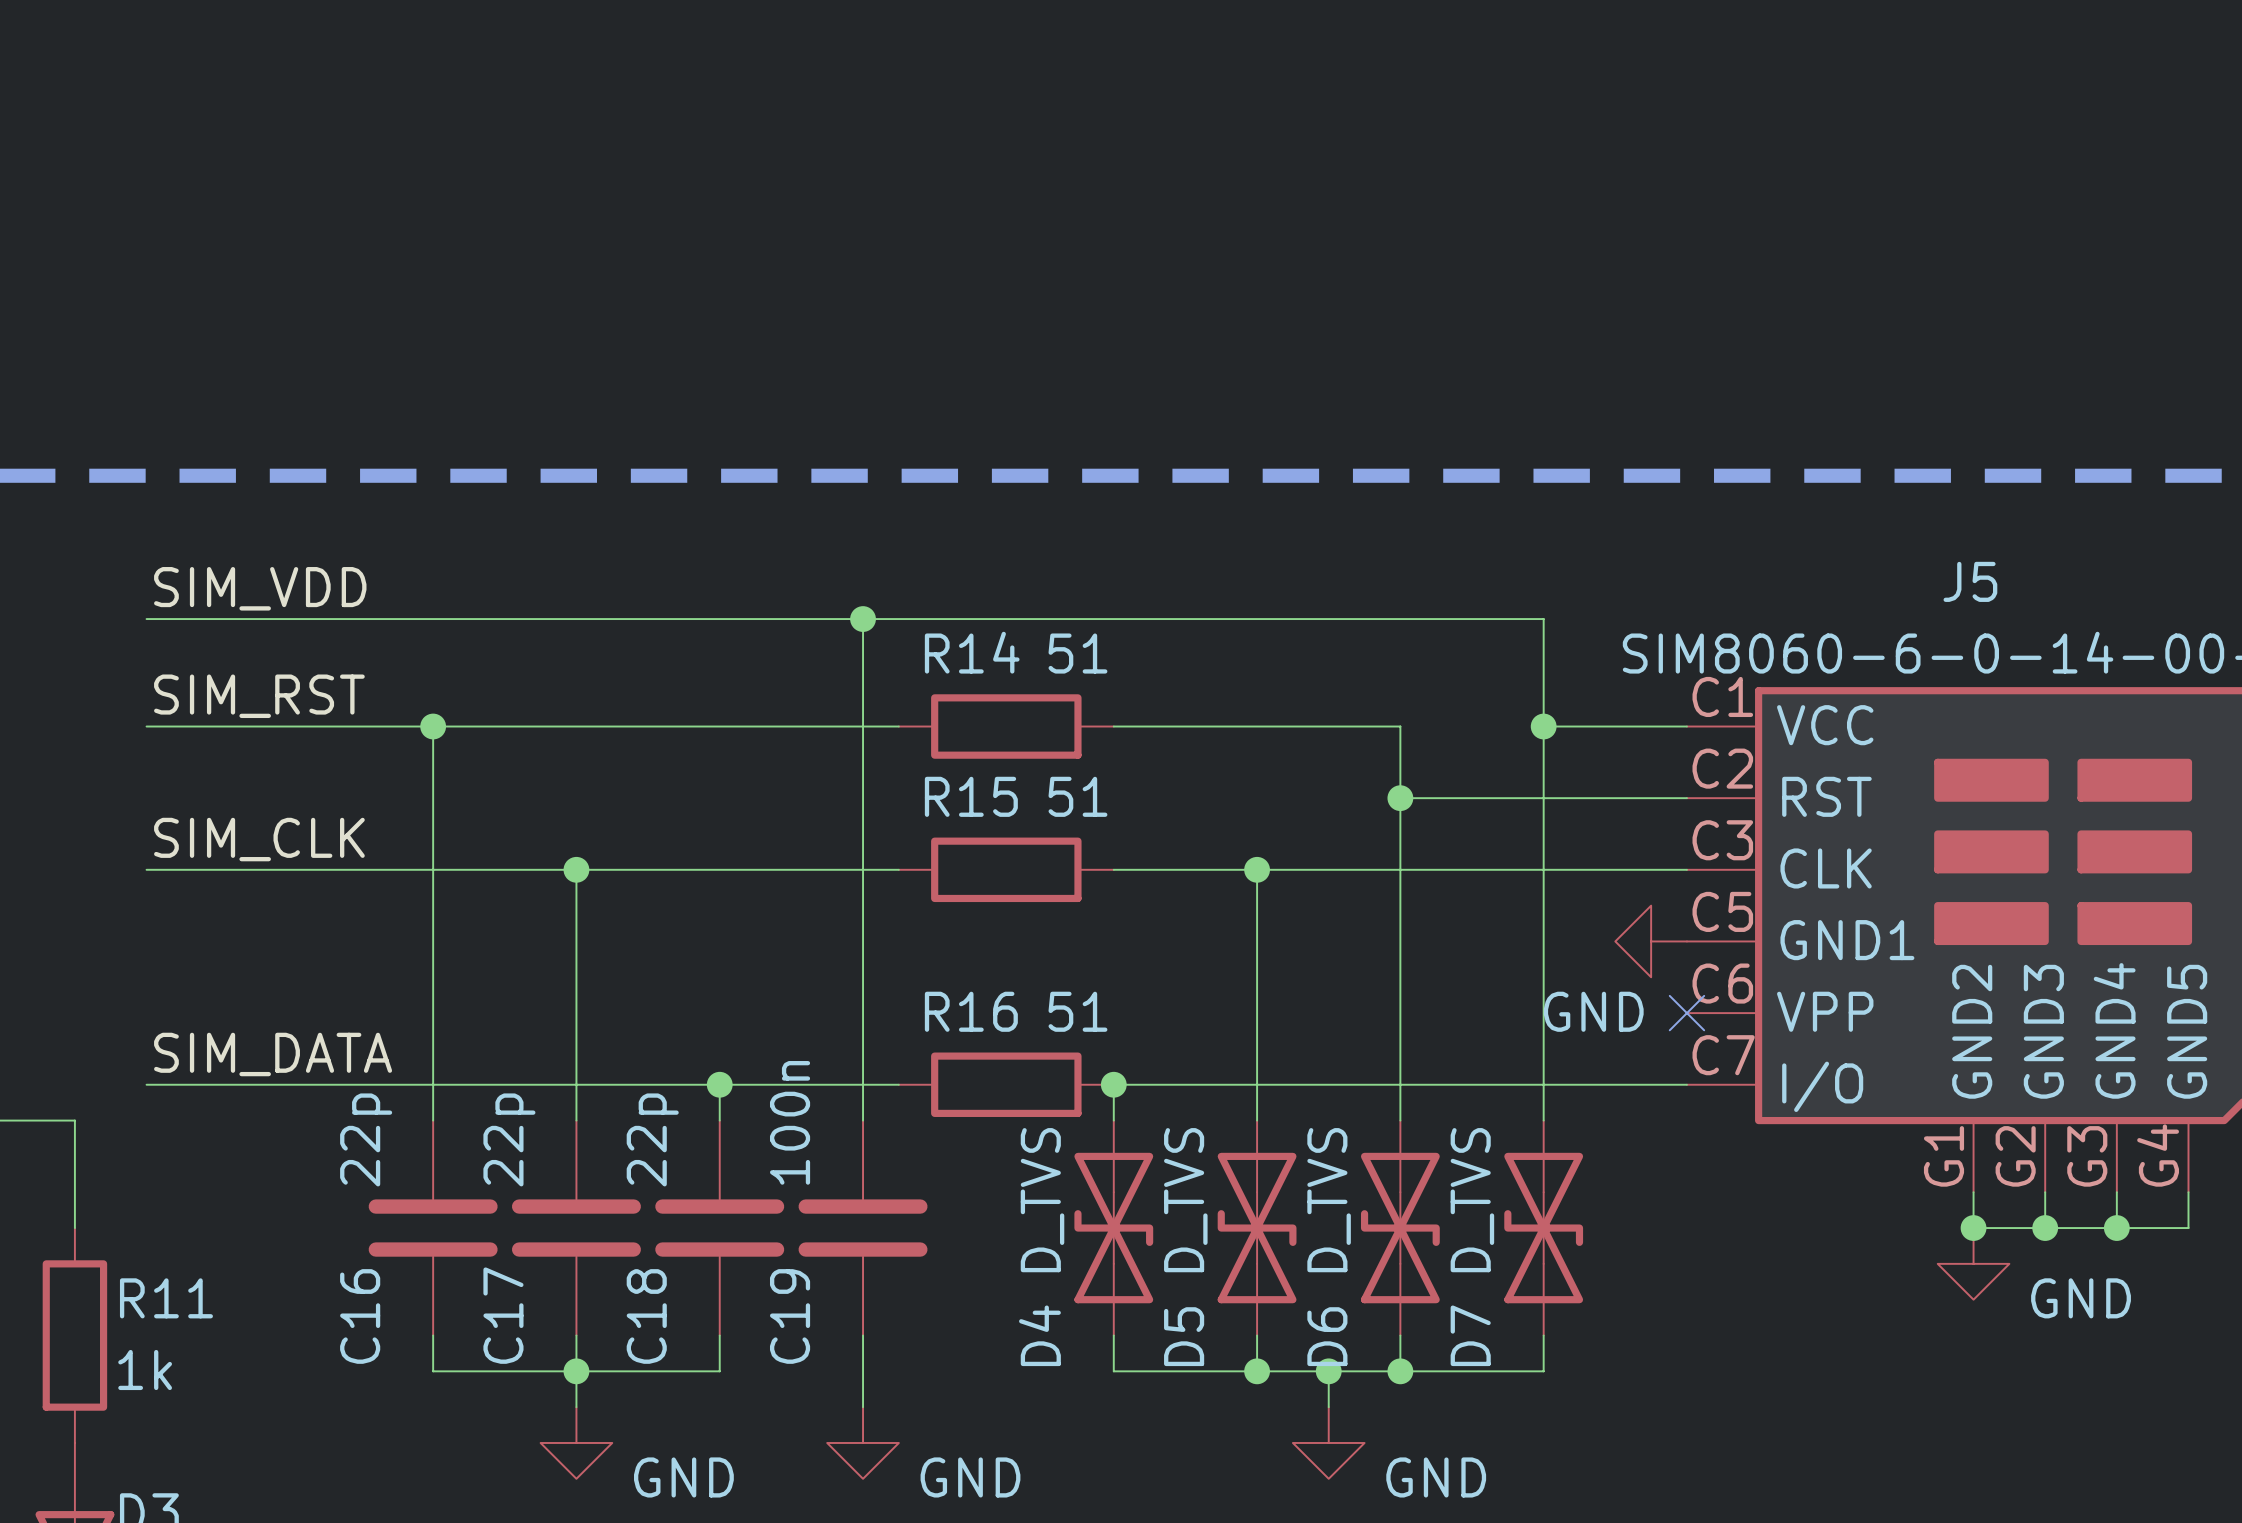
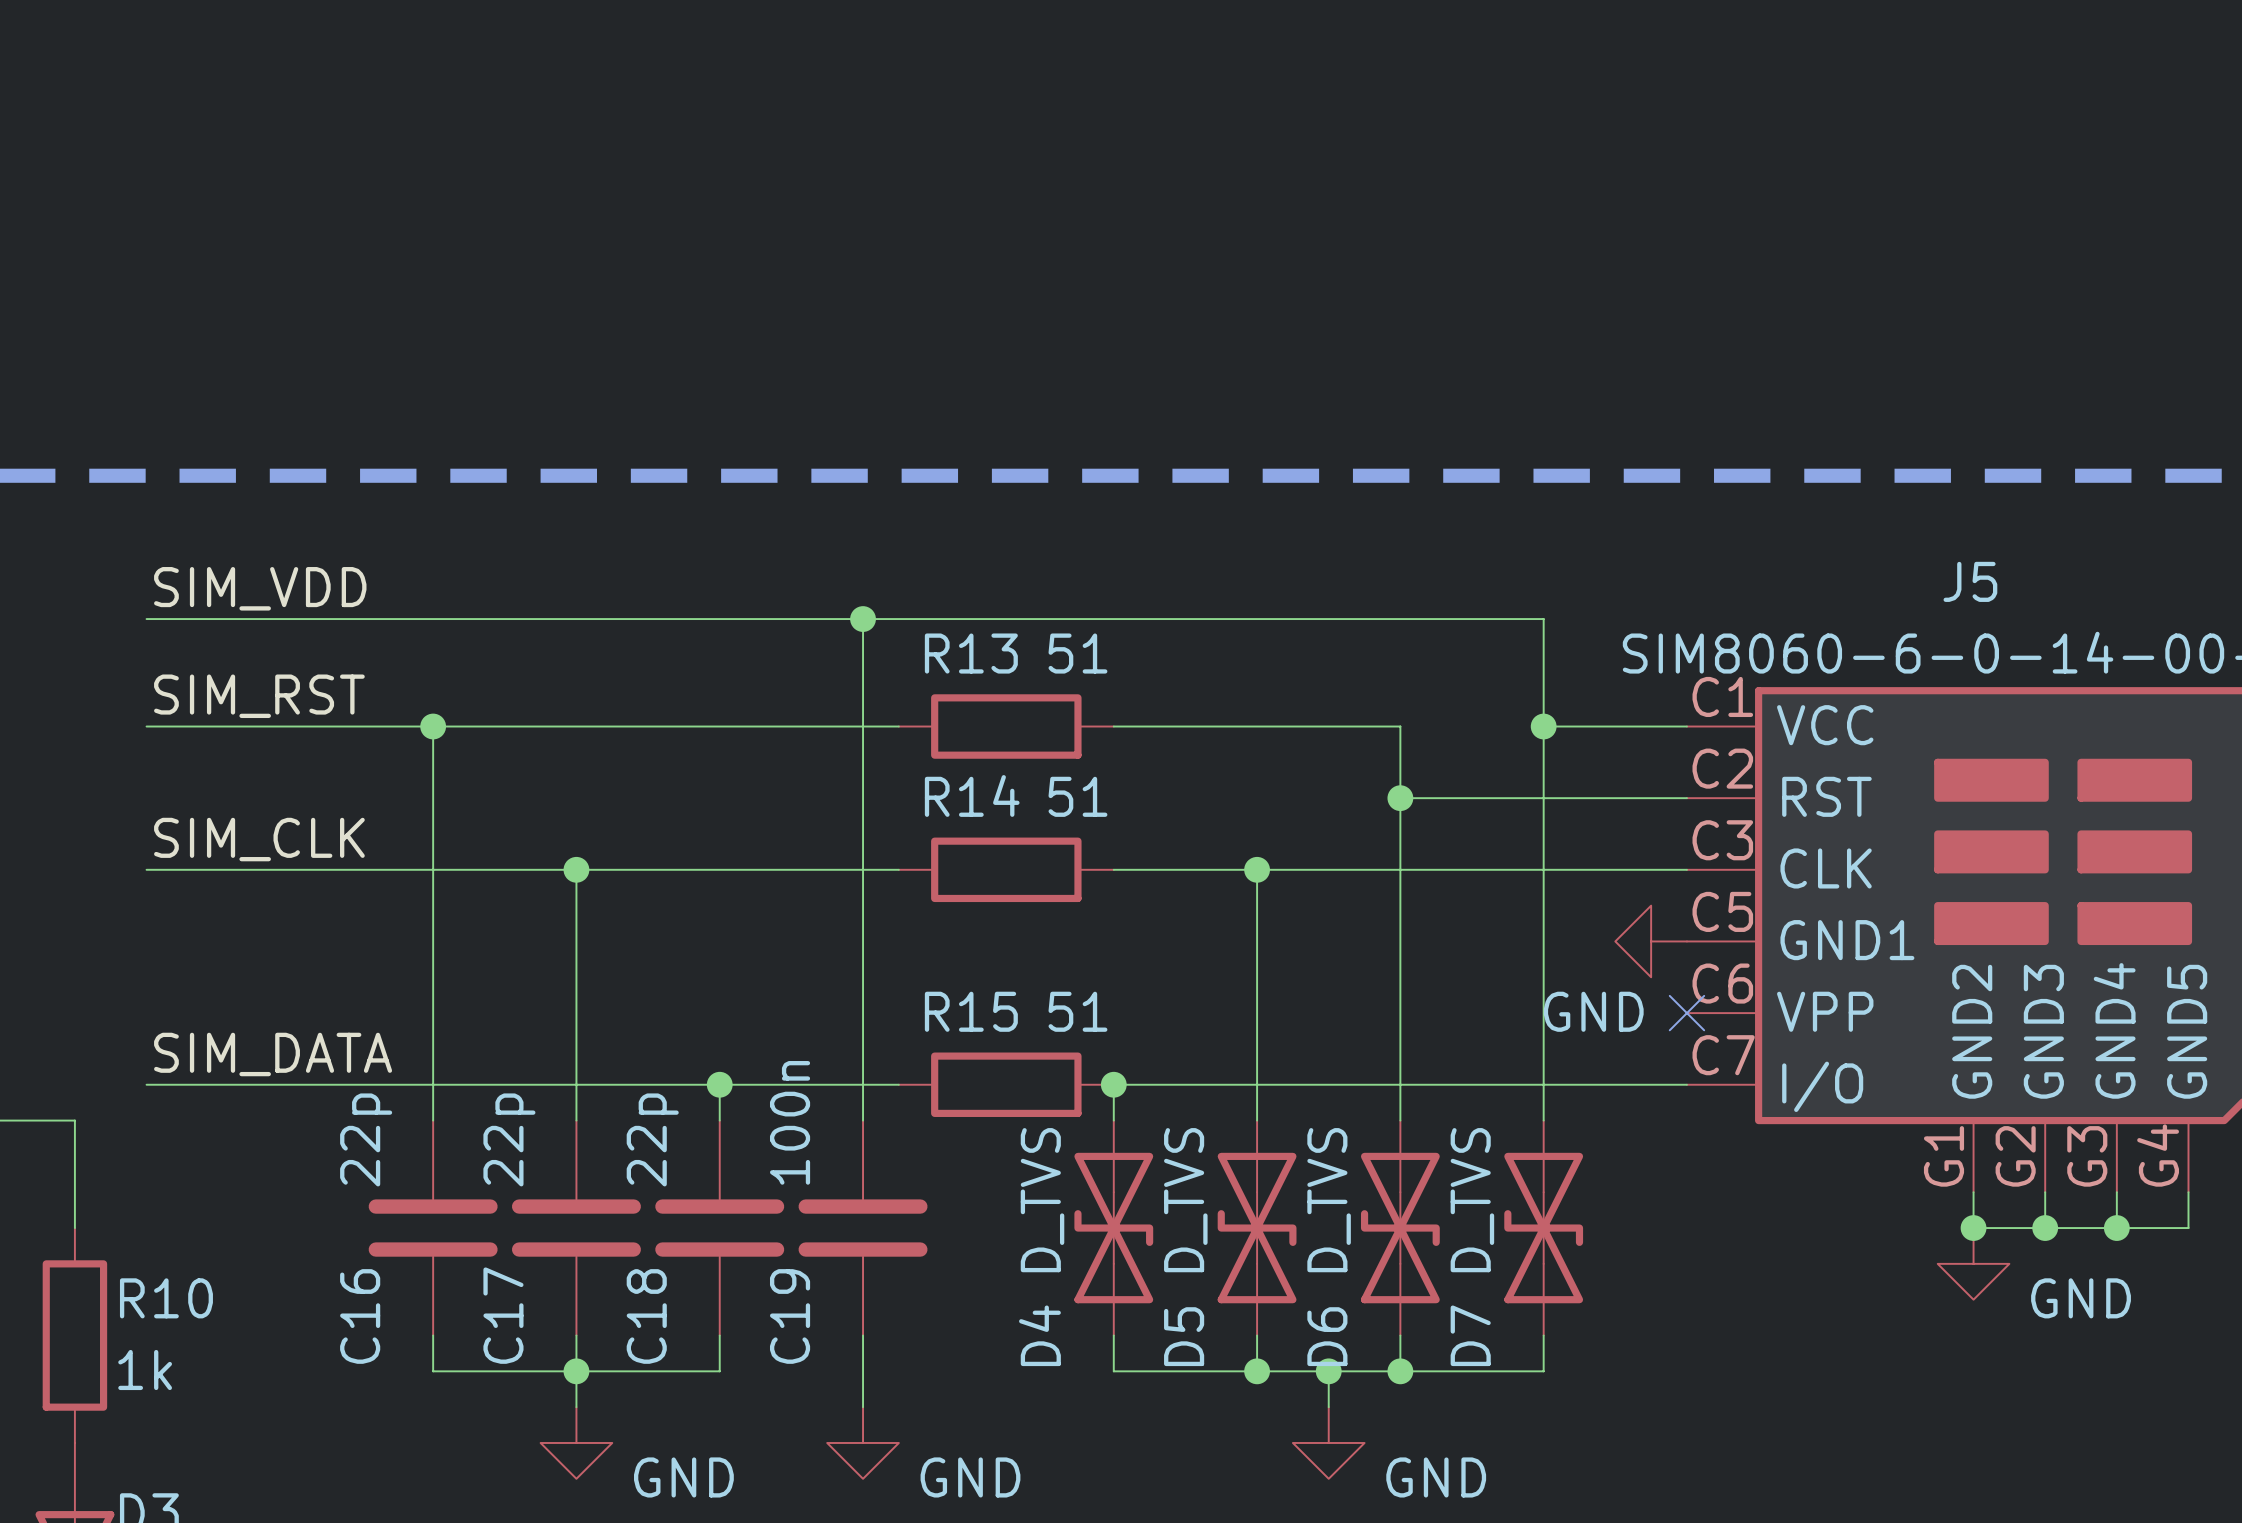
R14 name: R14 (972, 652) -> R13 (971, 653)
R15 name: R15 (971, 796) -> R14 (972, 795)
R16 name: R16 (971, 1011) -> R15 (971, 1011)
R11 name: R11 (166, 1298) -> R10 (166, 1298)

